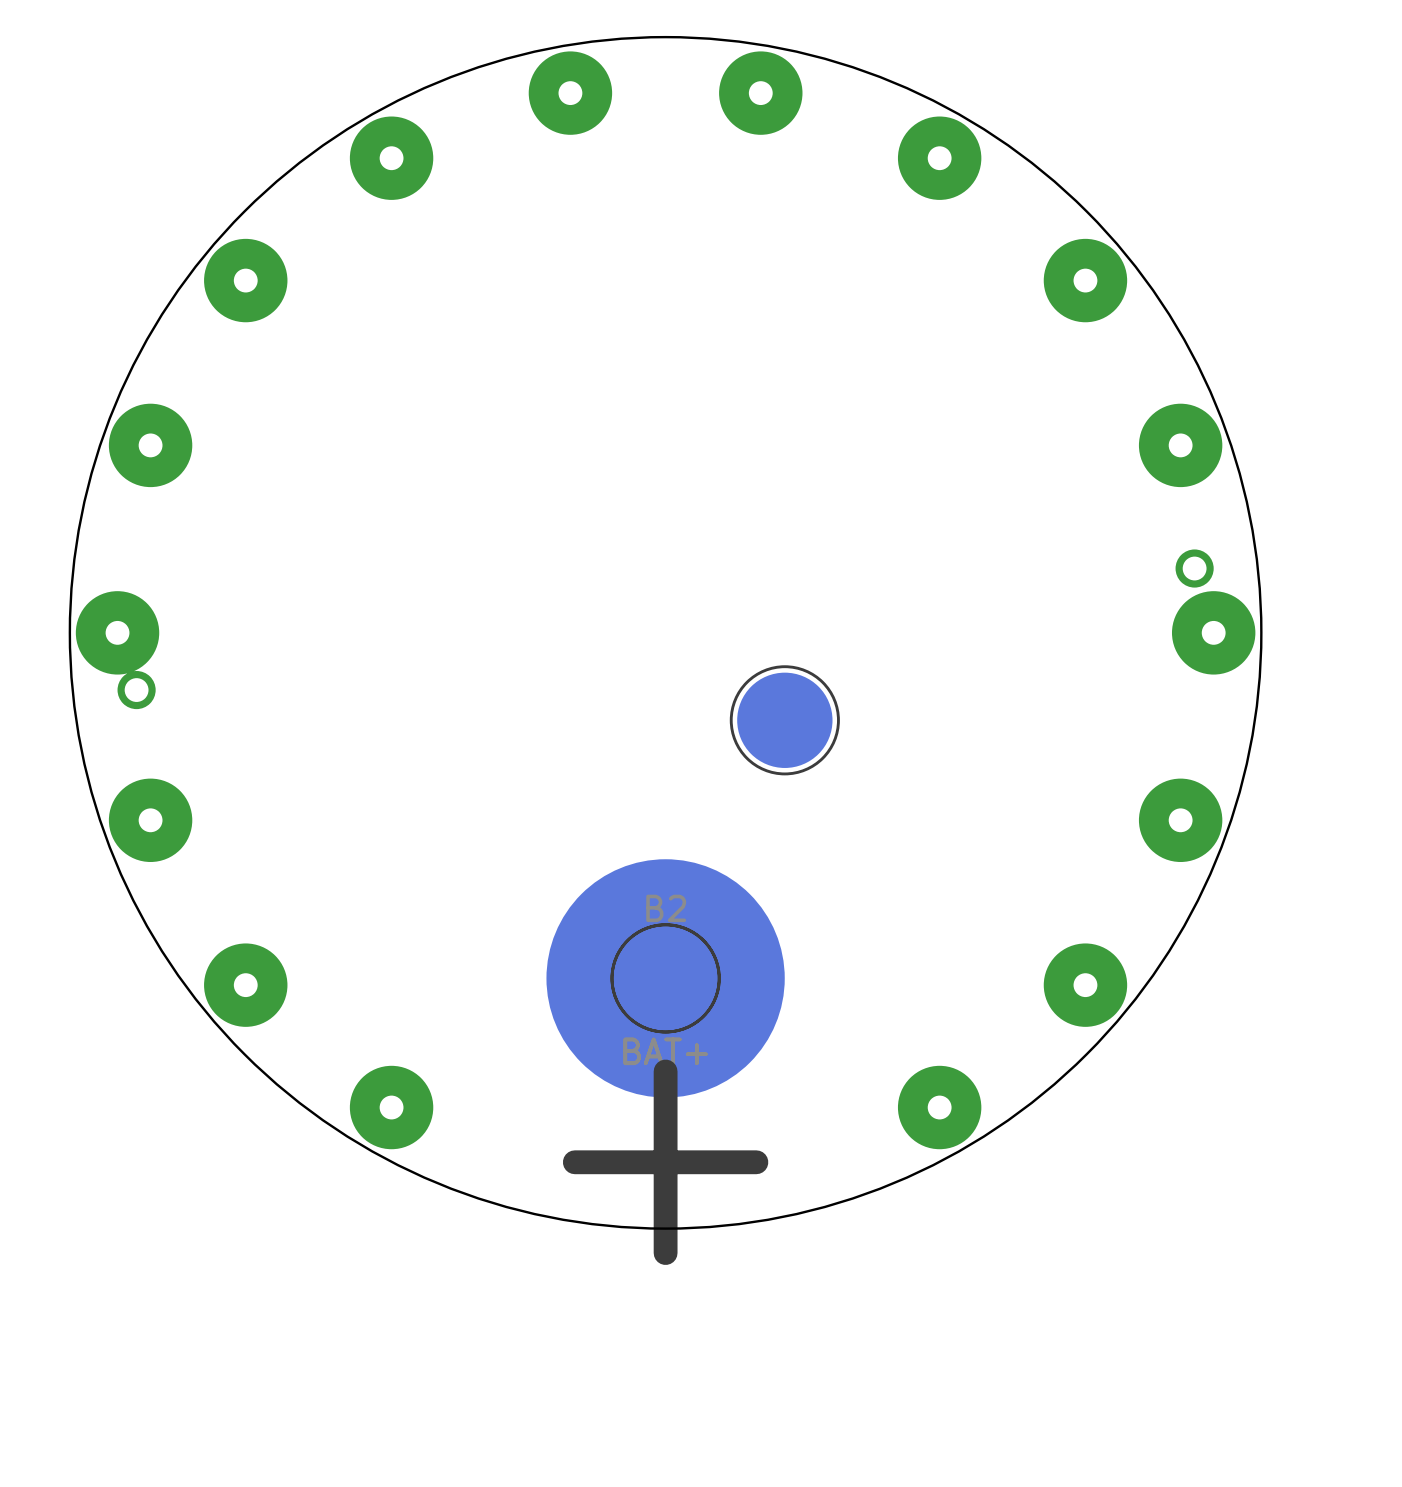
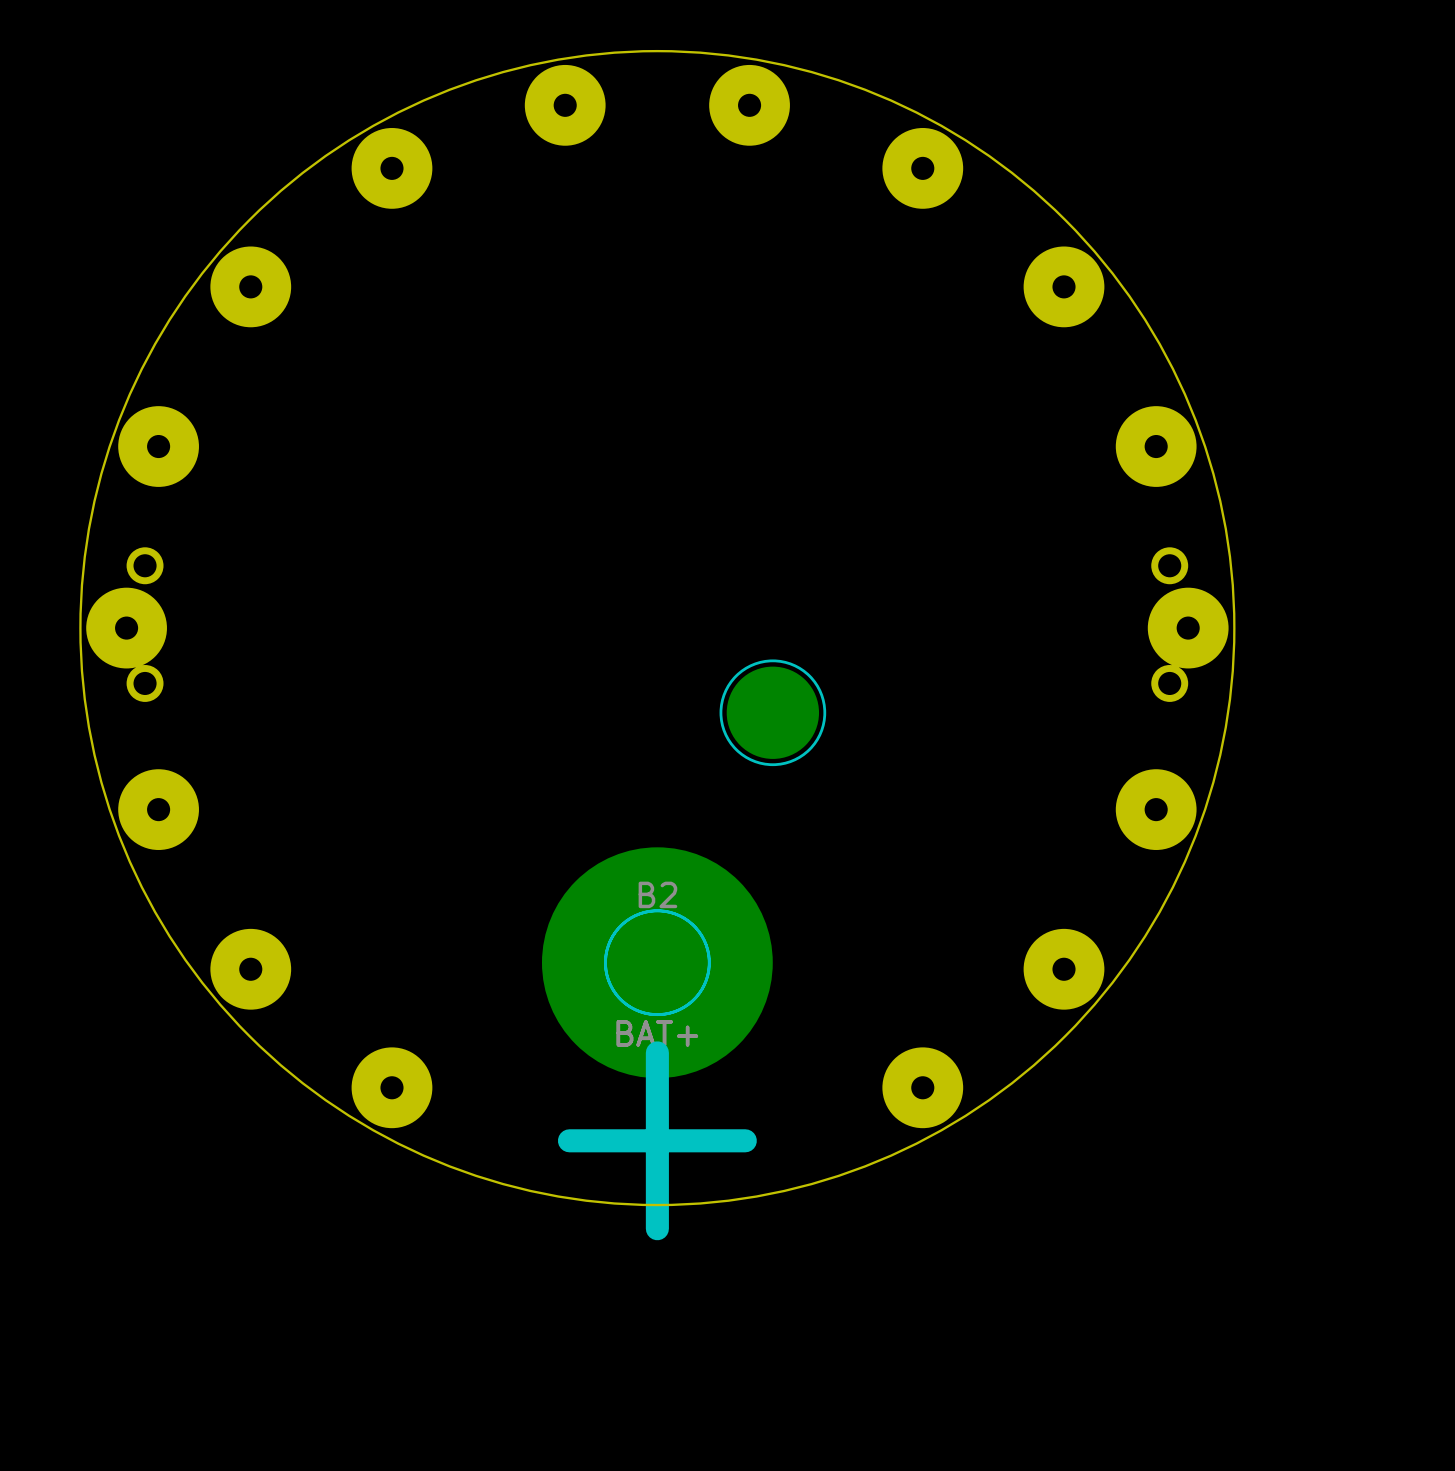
part: none -> (145, 565)
part: none -> (1169, 683)

